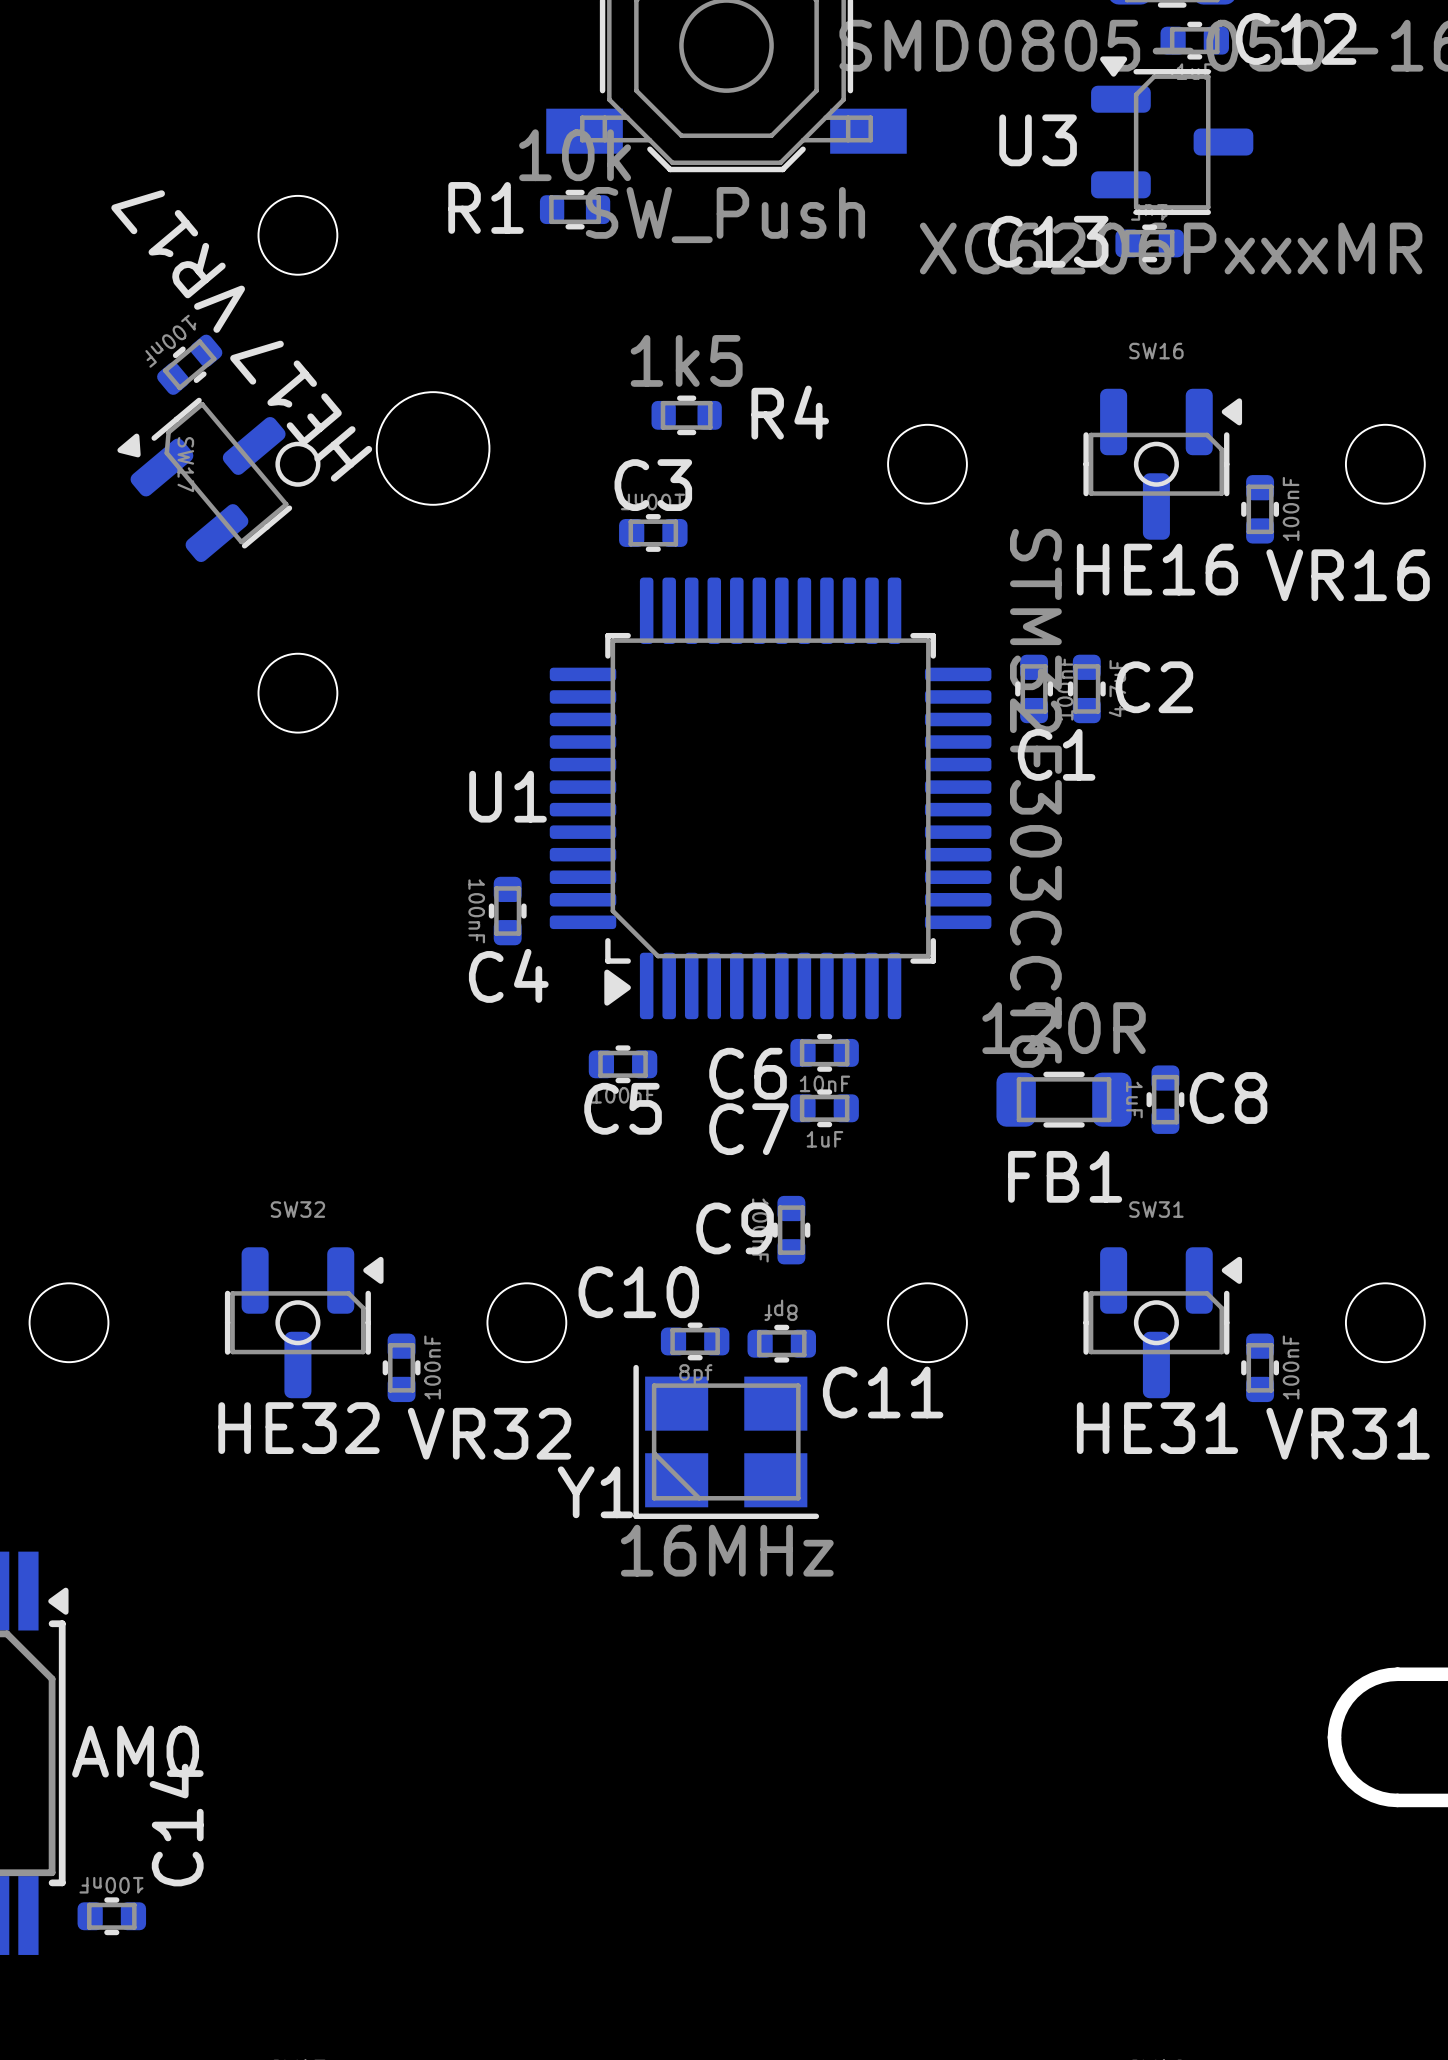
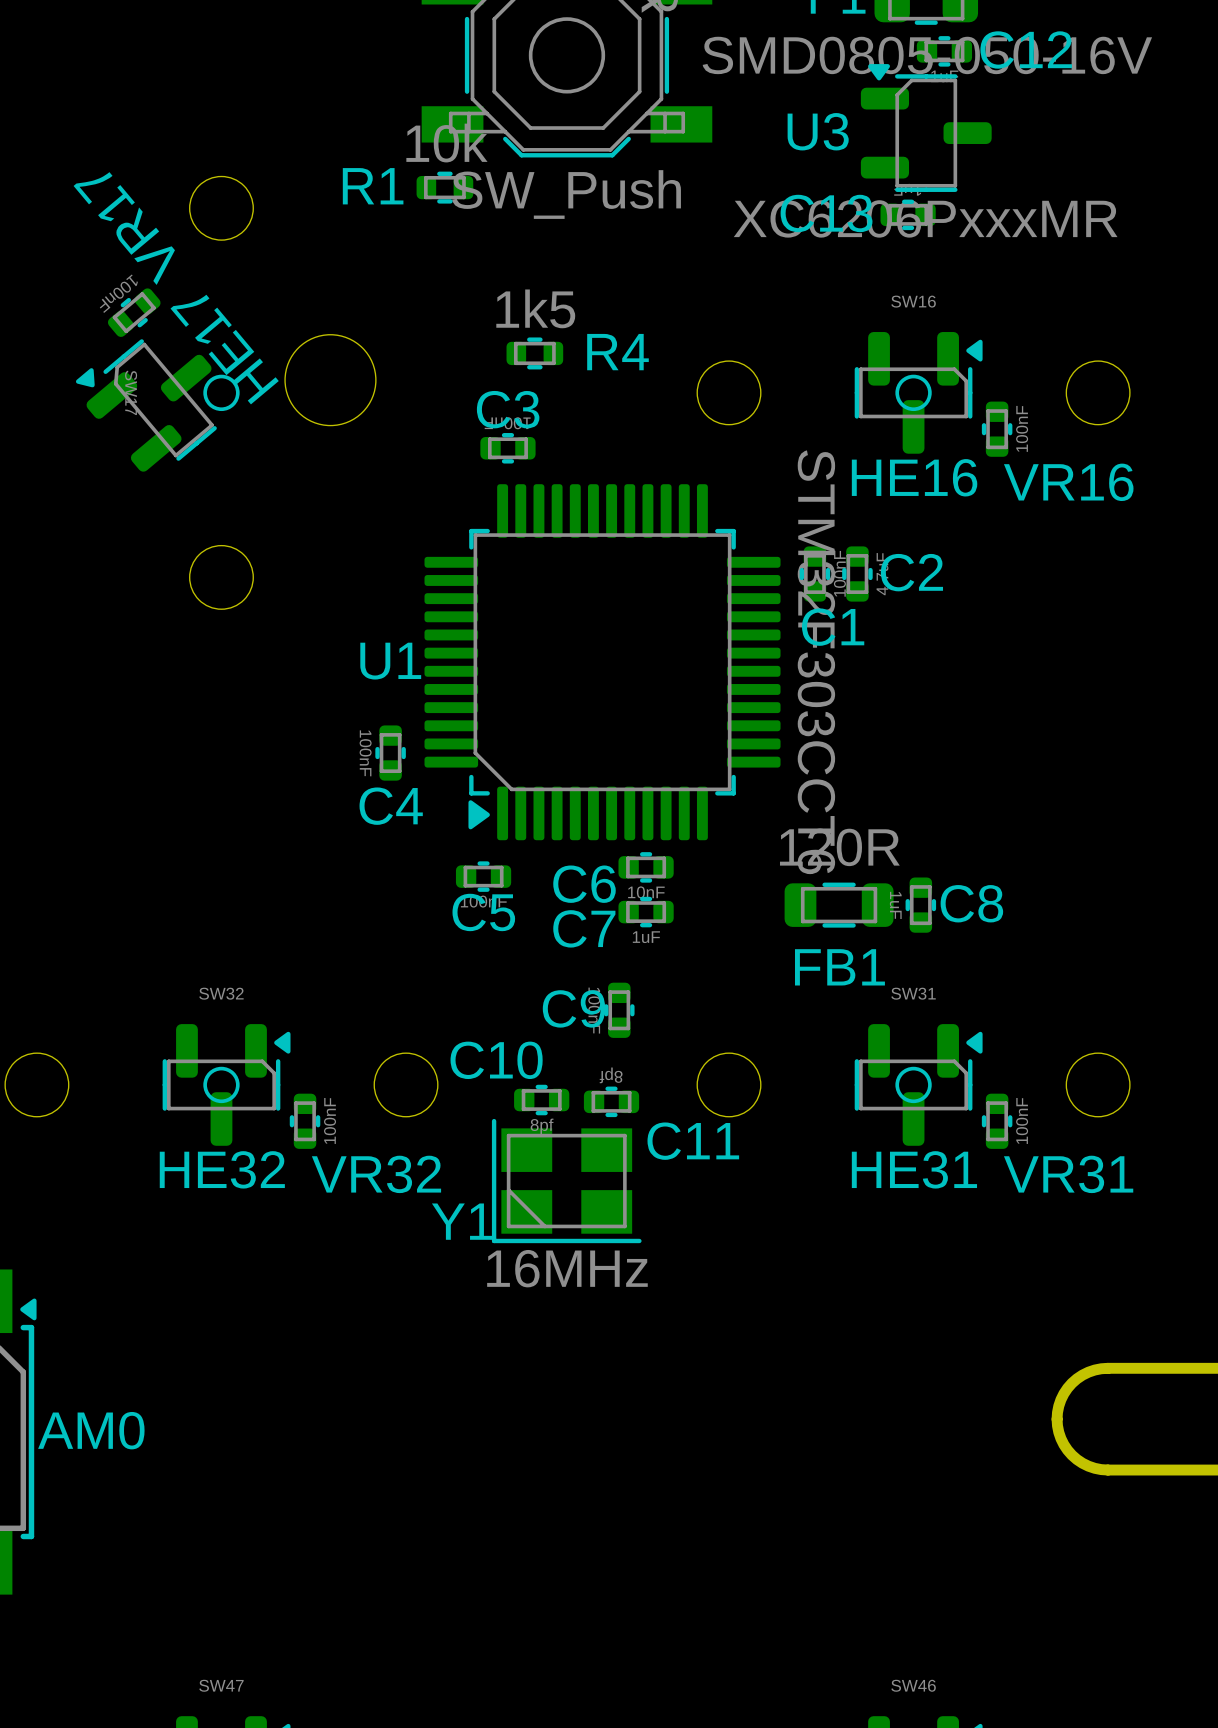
C14: 100nF (111, 1916) -> none

